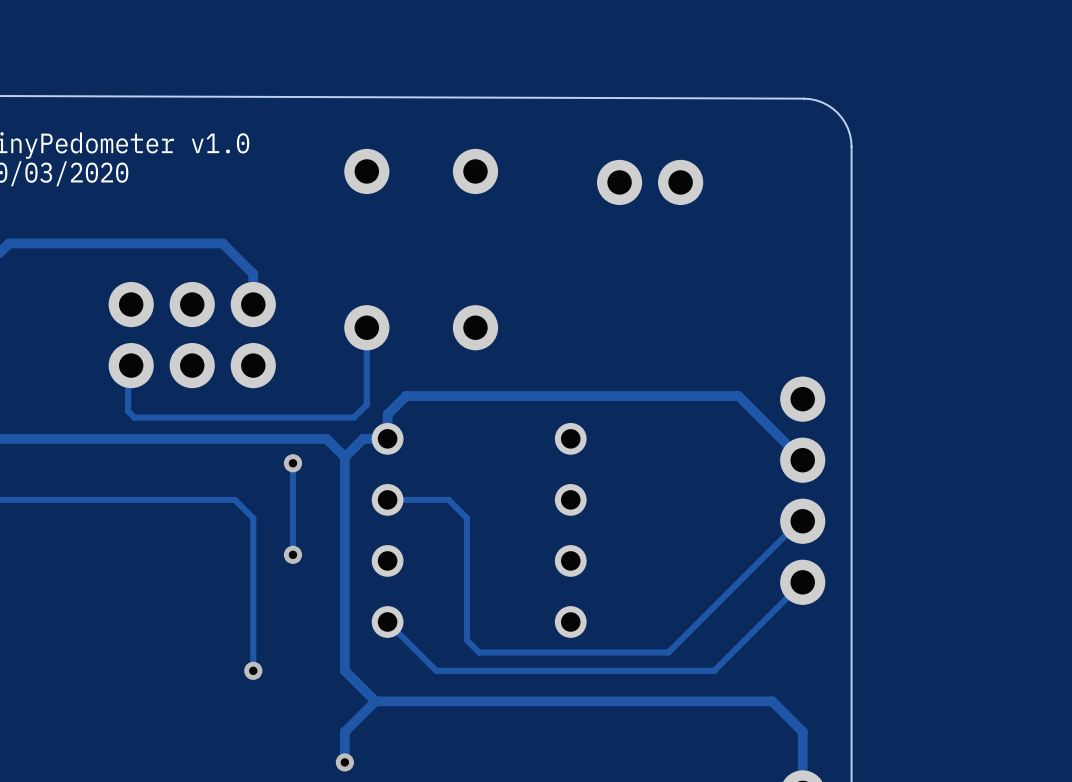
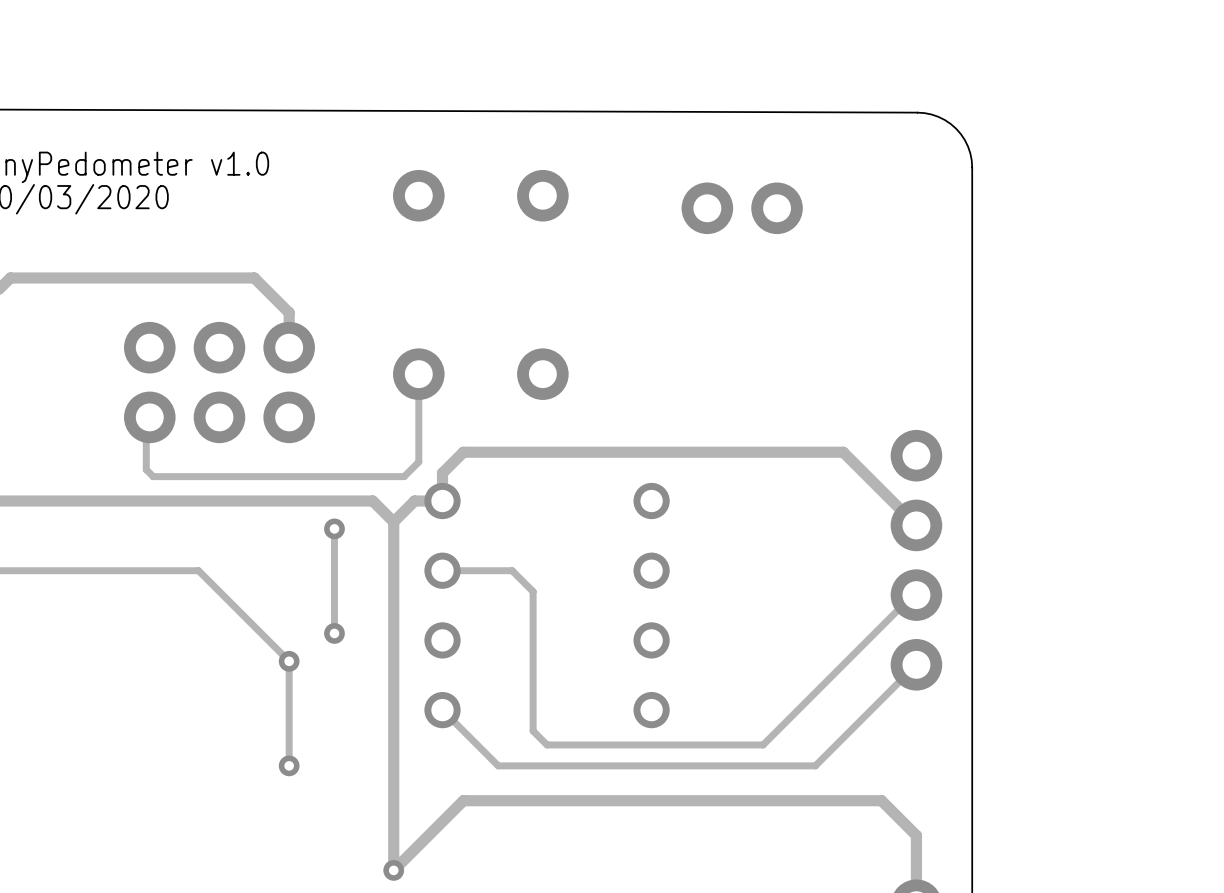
track: (173, 499) (234, 499) (253, 518) (253, 579) -> (198, 570) (289, 661)
via: none -> (289, 661)
track: (344, 670) (375, 701) -> (393, 765) (393, 835)
track: (375, 701) (344, 731) -> none
track: (405, 701) (375, 701) -> (463, 800) (393, 870)

